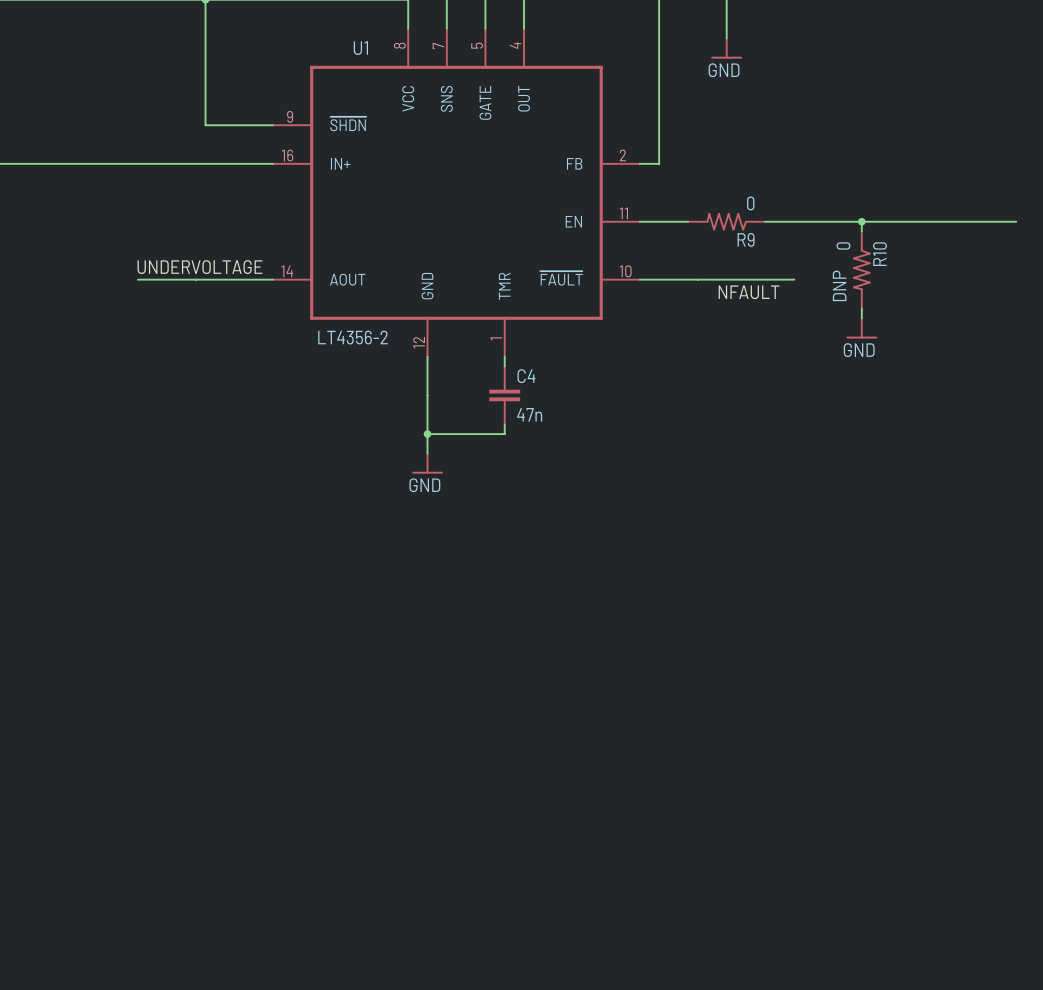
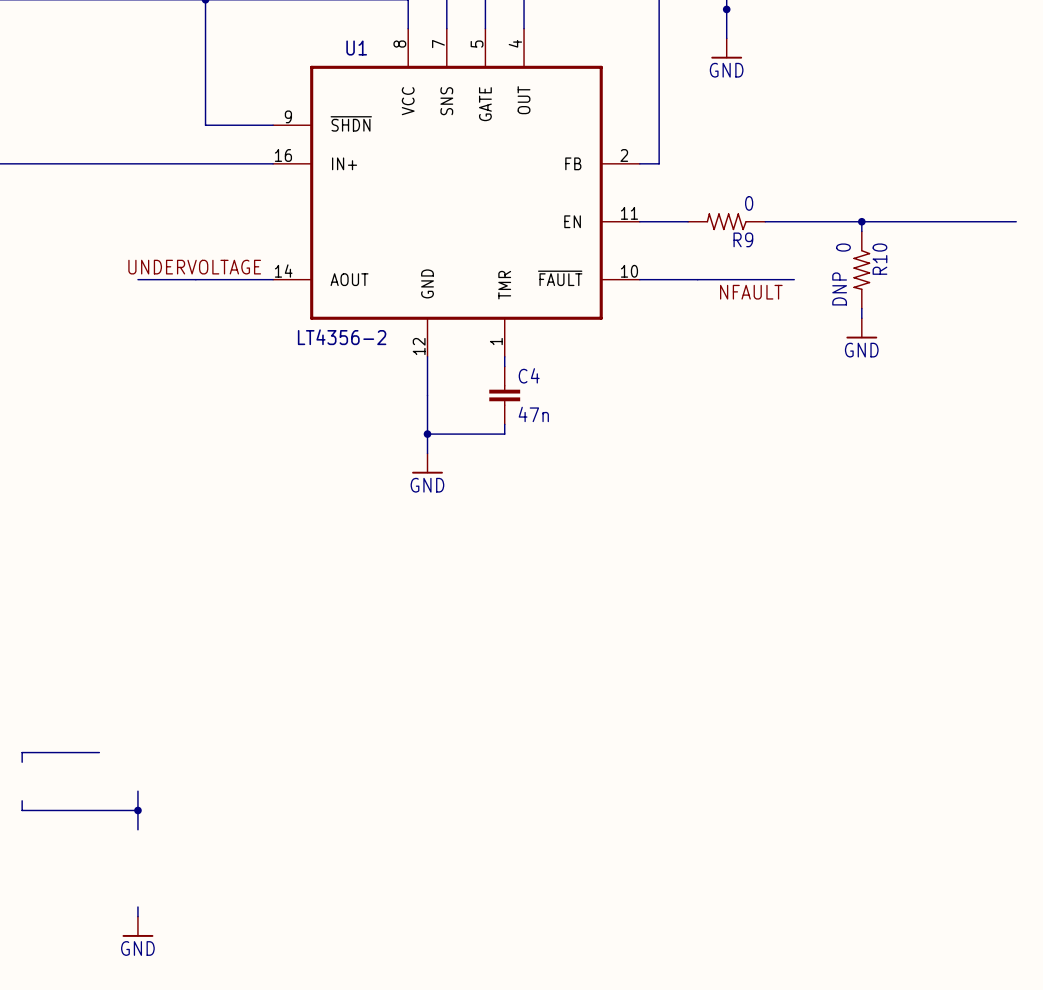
junction: none -> (726, 9)
wire: none -> (99, 752) (22, 752) (22, 762)
wire: none -> (137, 791) (137, 829)
wire: none -> (22, 800) (22, 810) (137, 810)
junction: none -> (137, 810)
wire: none -> (137, 906) (137, 916)
power symbol: none -> GND (137, 926)

